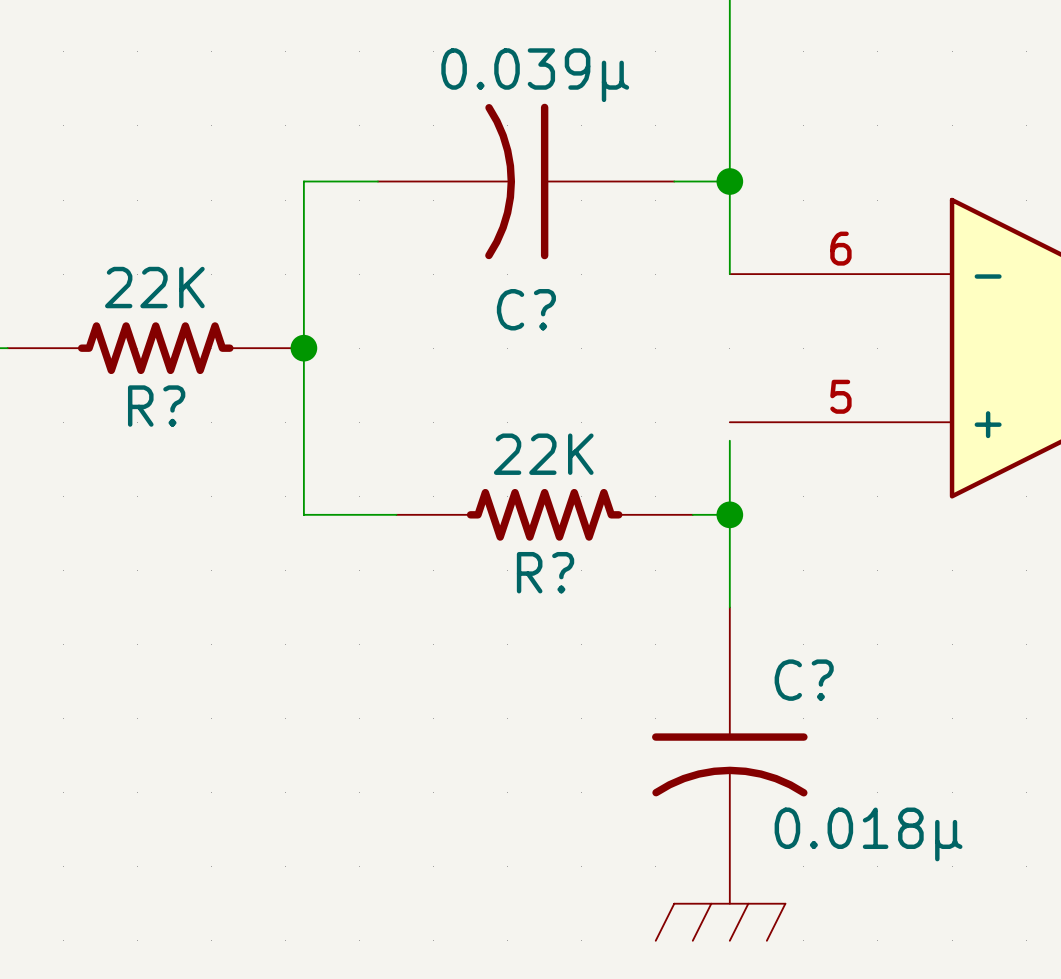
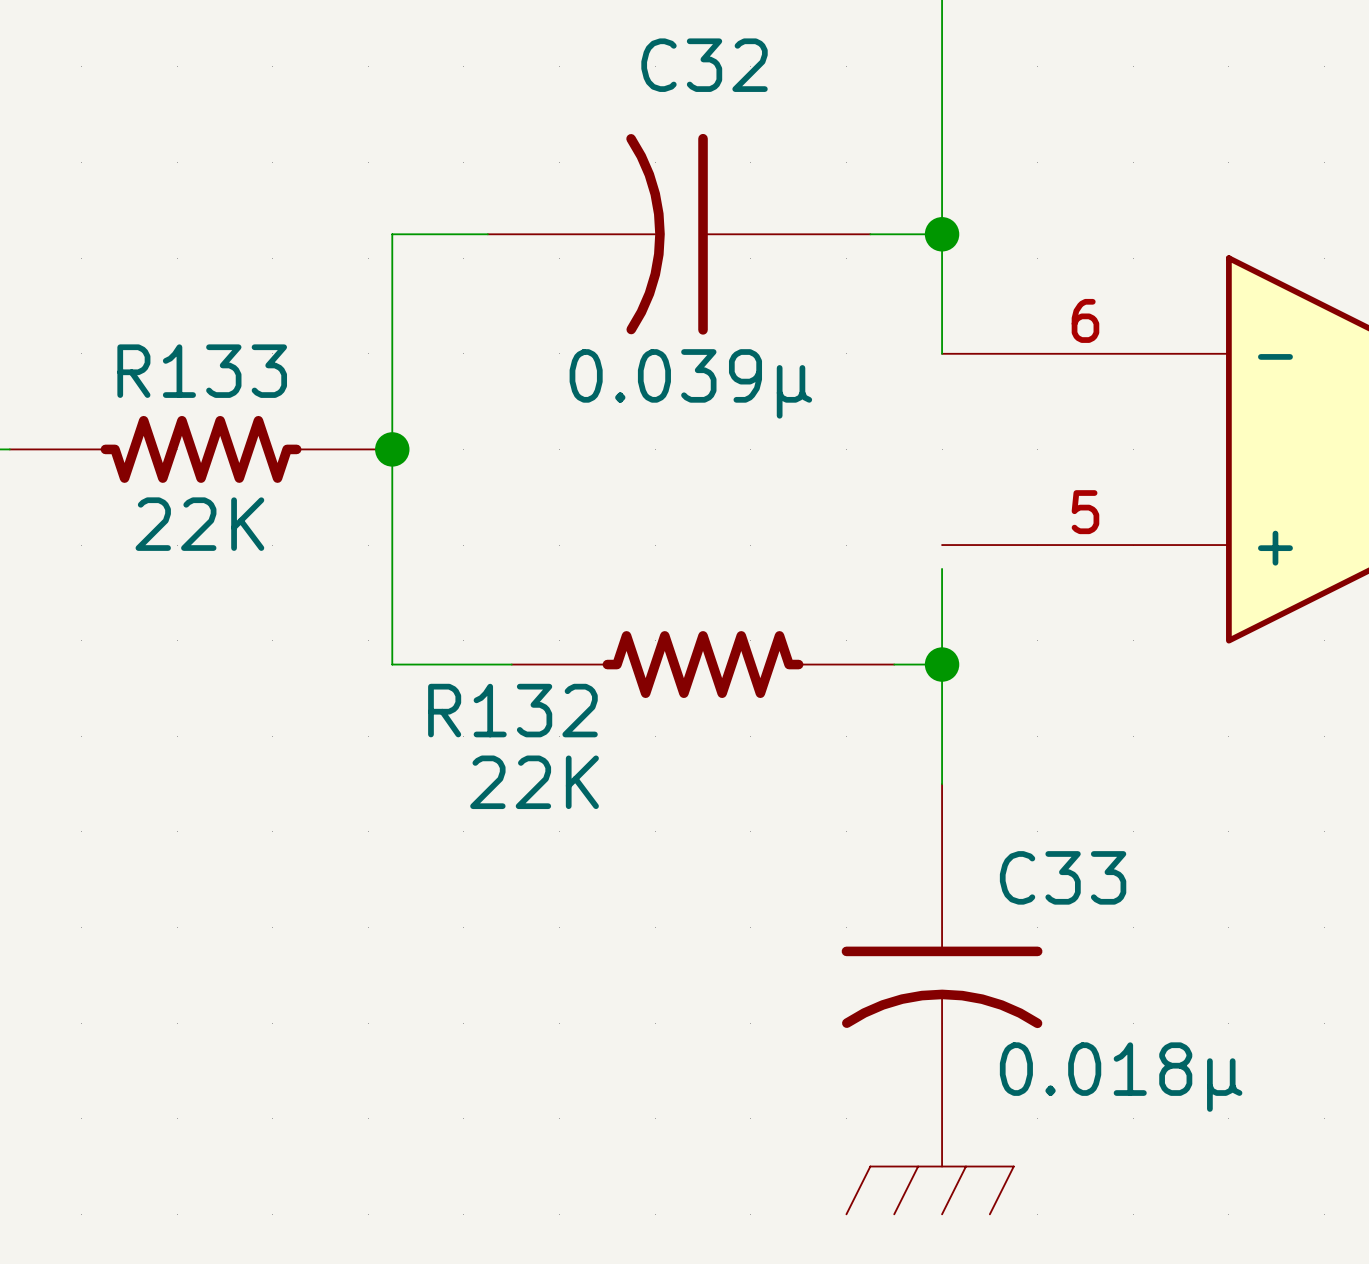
C?: 0.039μ (526, 181) -> none
C32: none -> 0.039μ (679, 234)
R?: 22K (155, 348) -> none
R133: none -> 22K (201, 449)
R? value position: 22K (543, 454) -> 22K (534, 782)
R? name: R? (545, 572) -> R132 (512, 710)
C? name: C? (804, 680) -> C33 (1063, 877)

